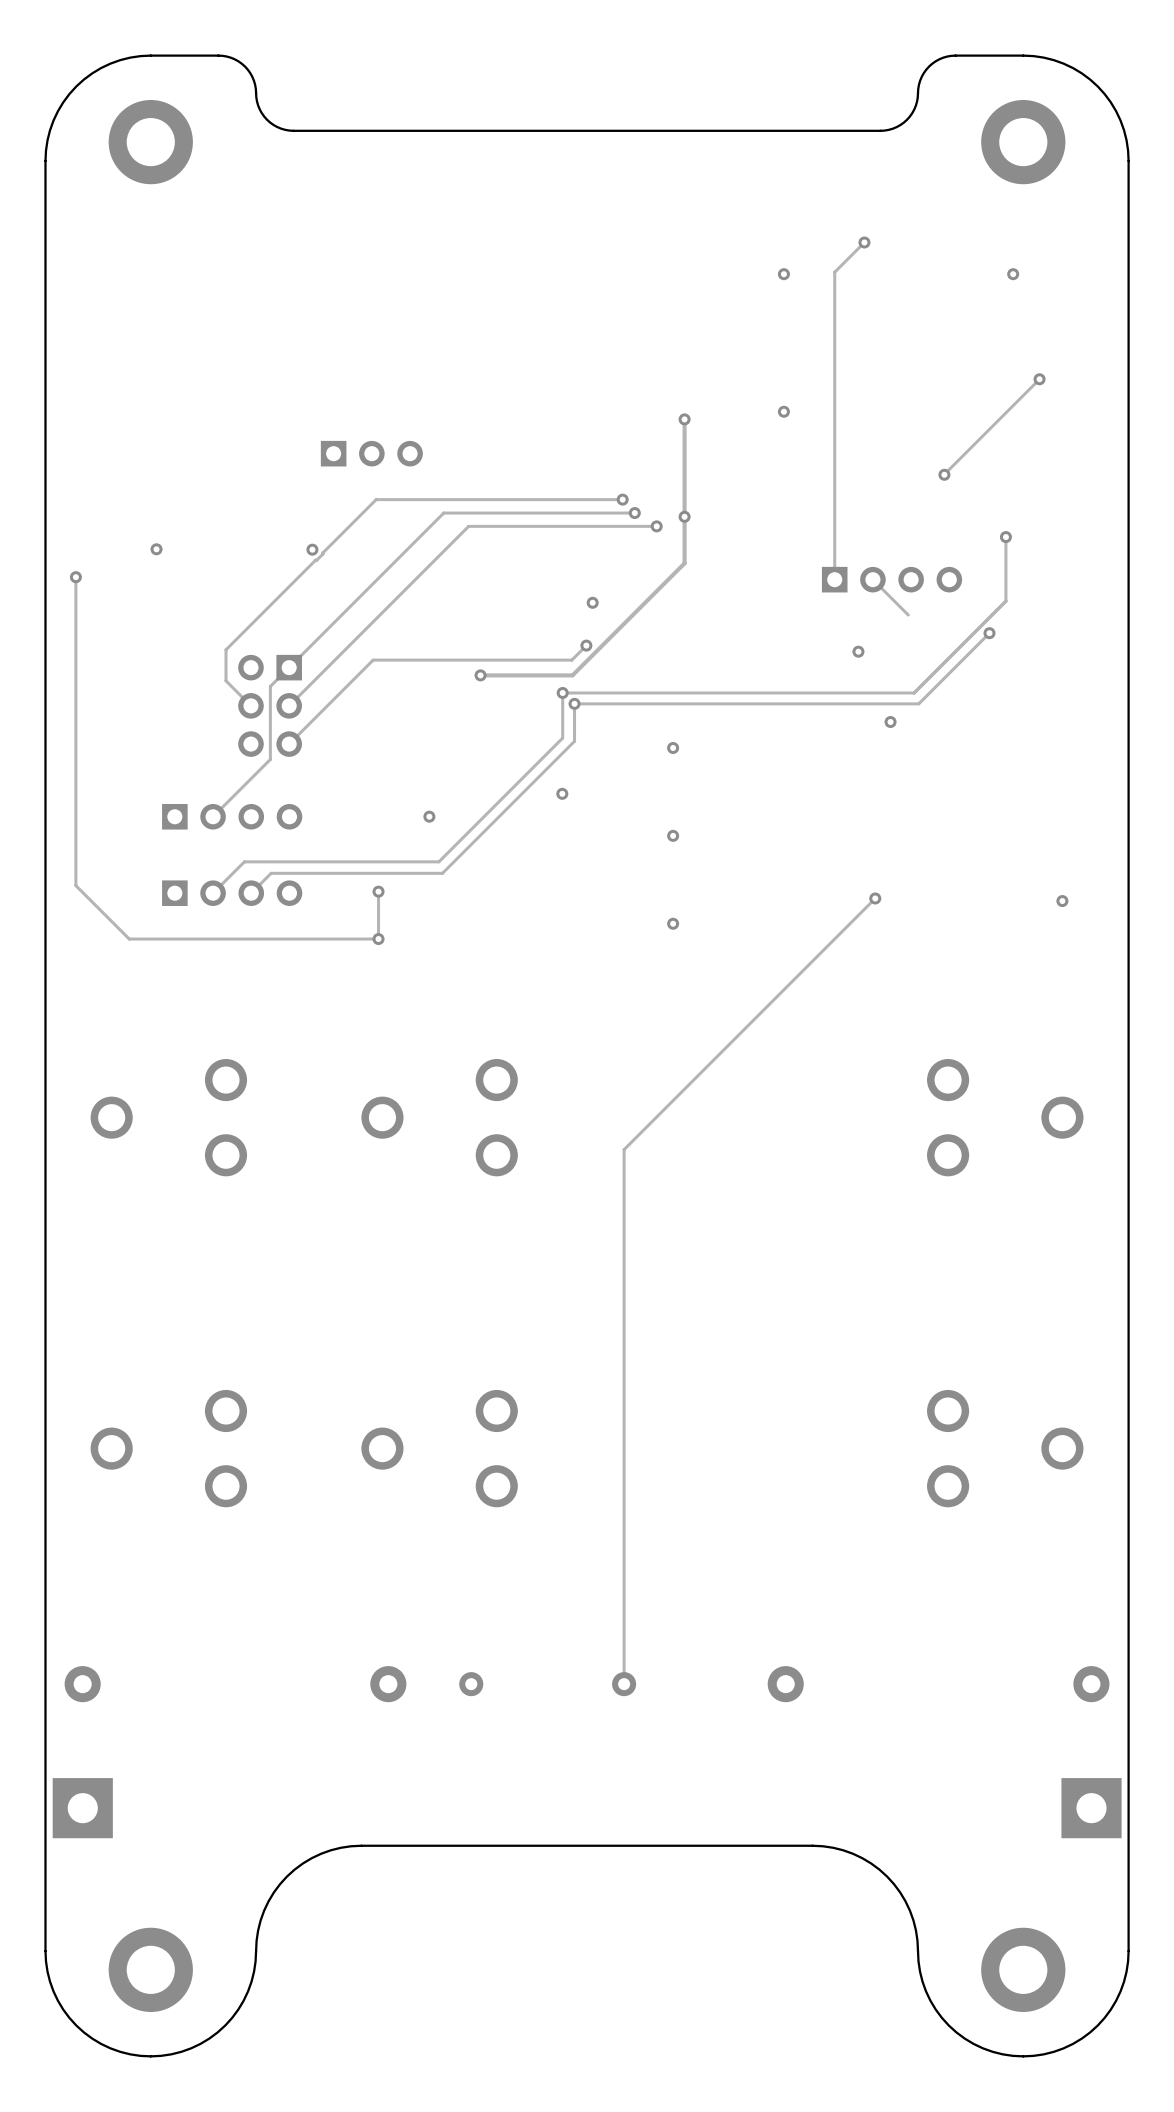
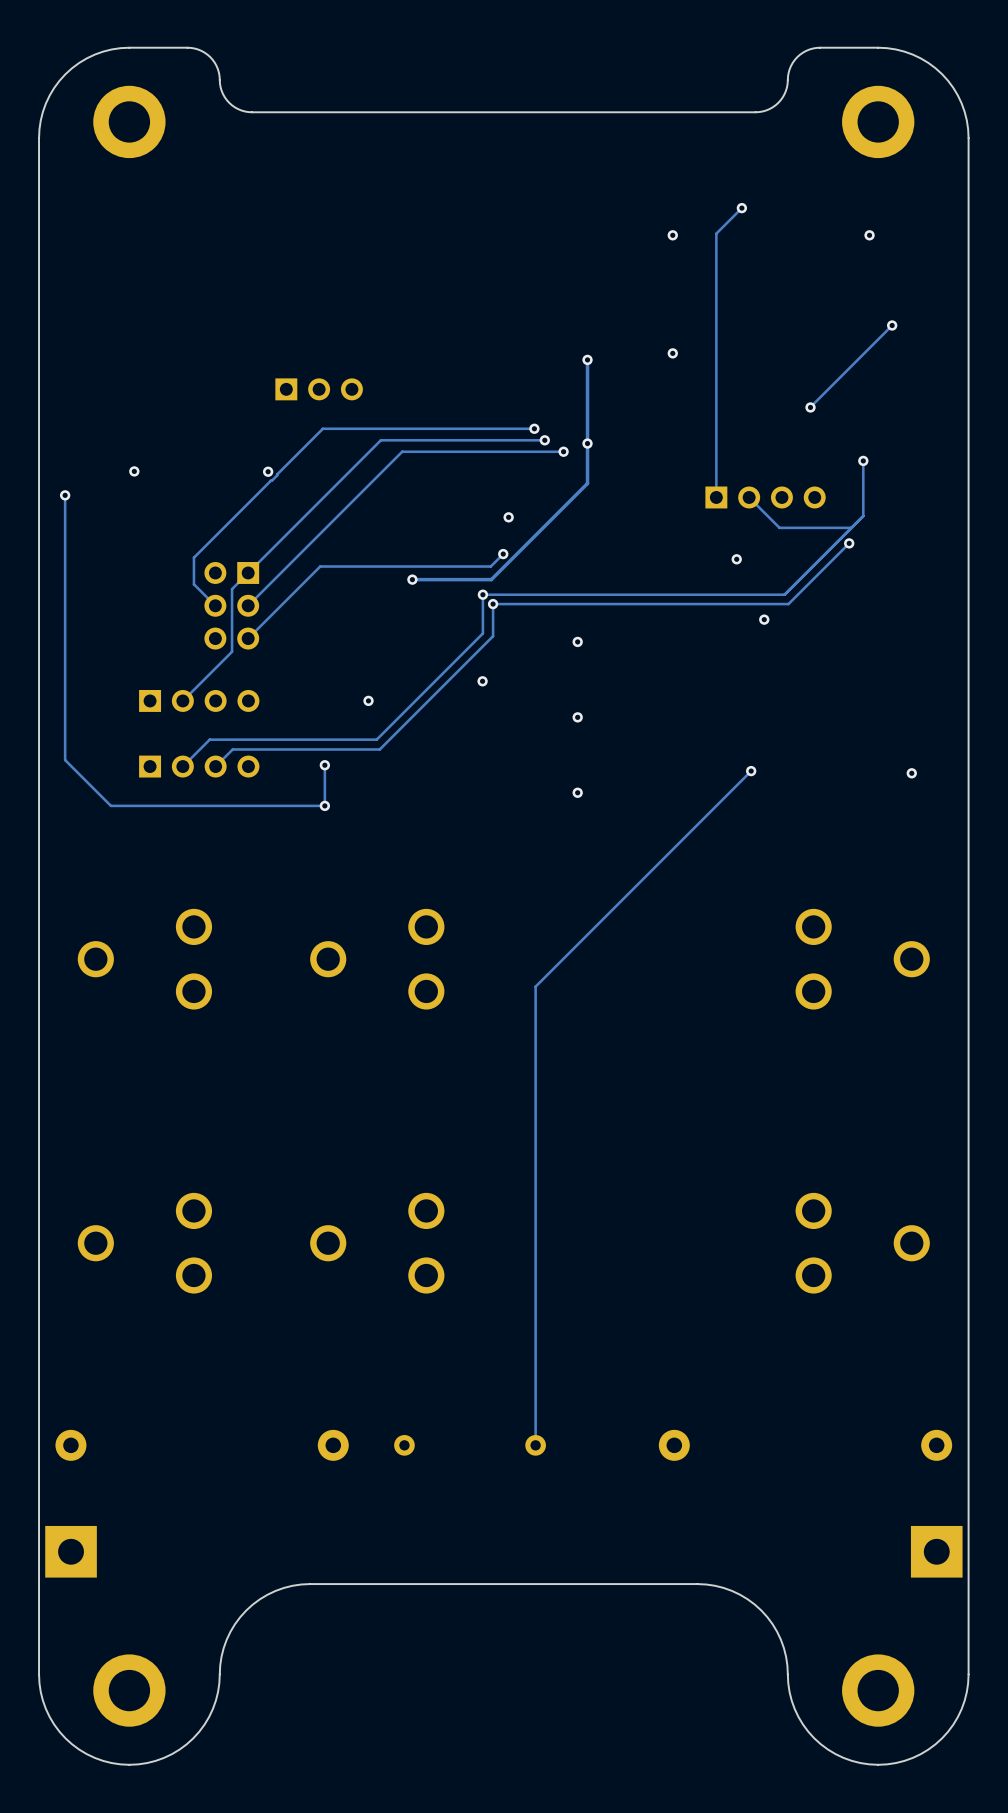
track: none -> (851, 527) (779, 527)

